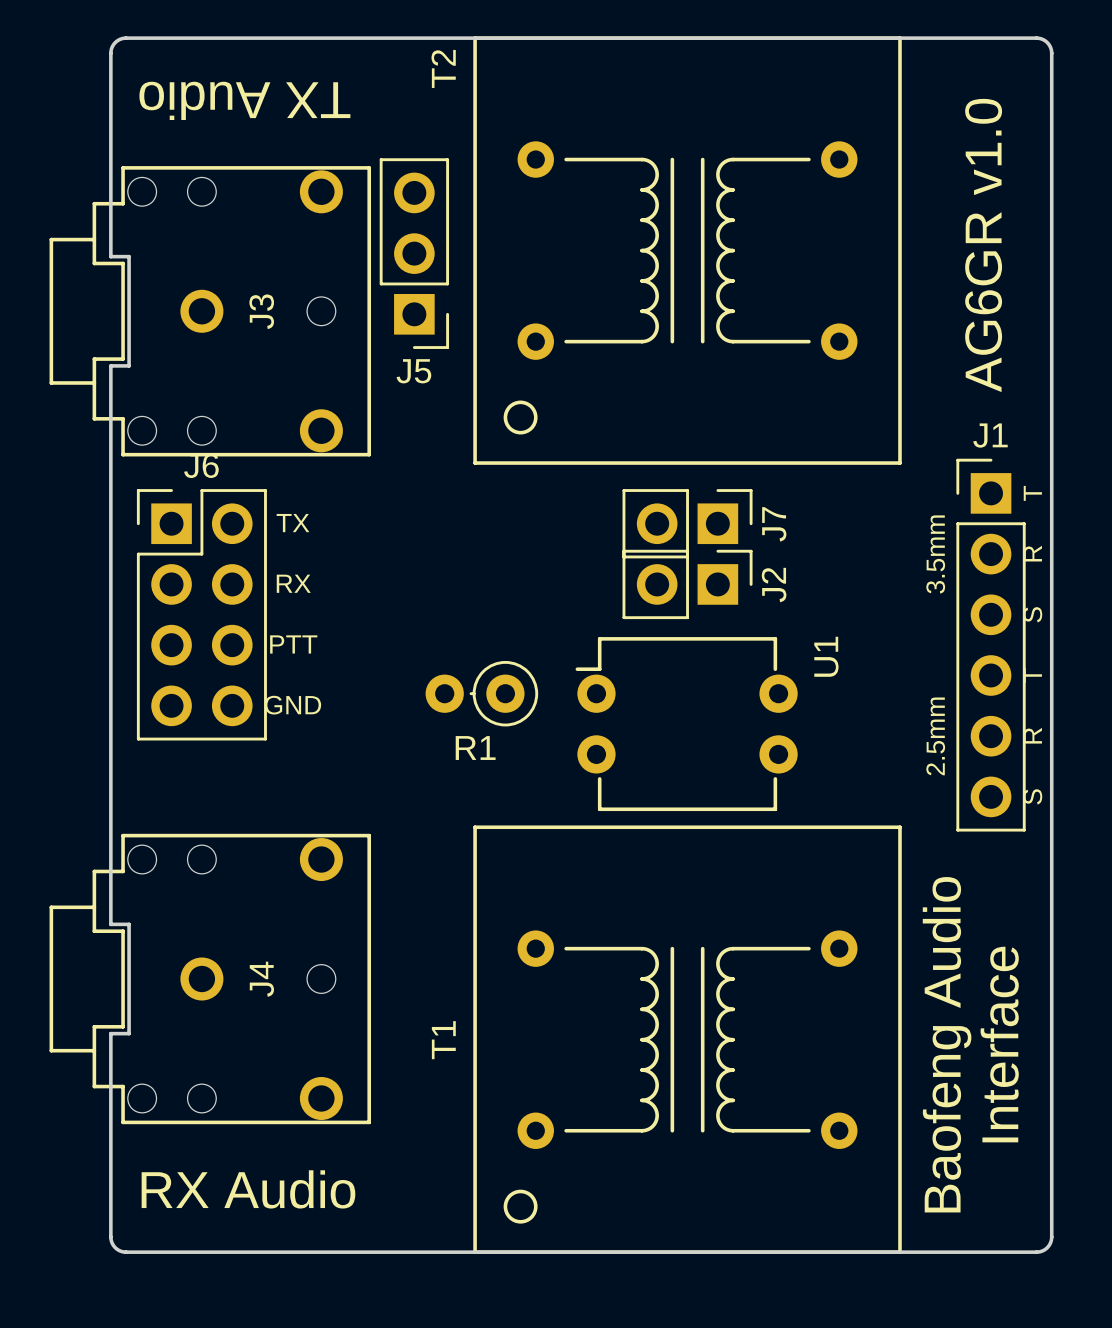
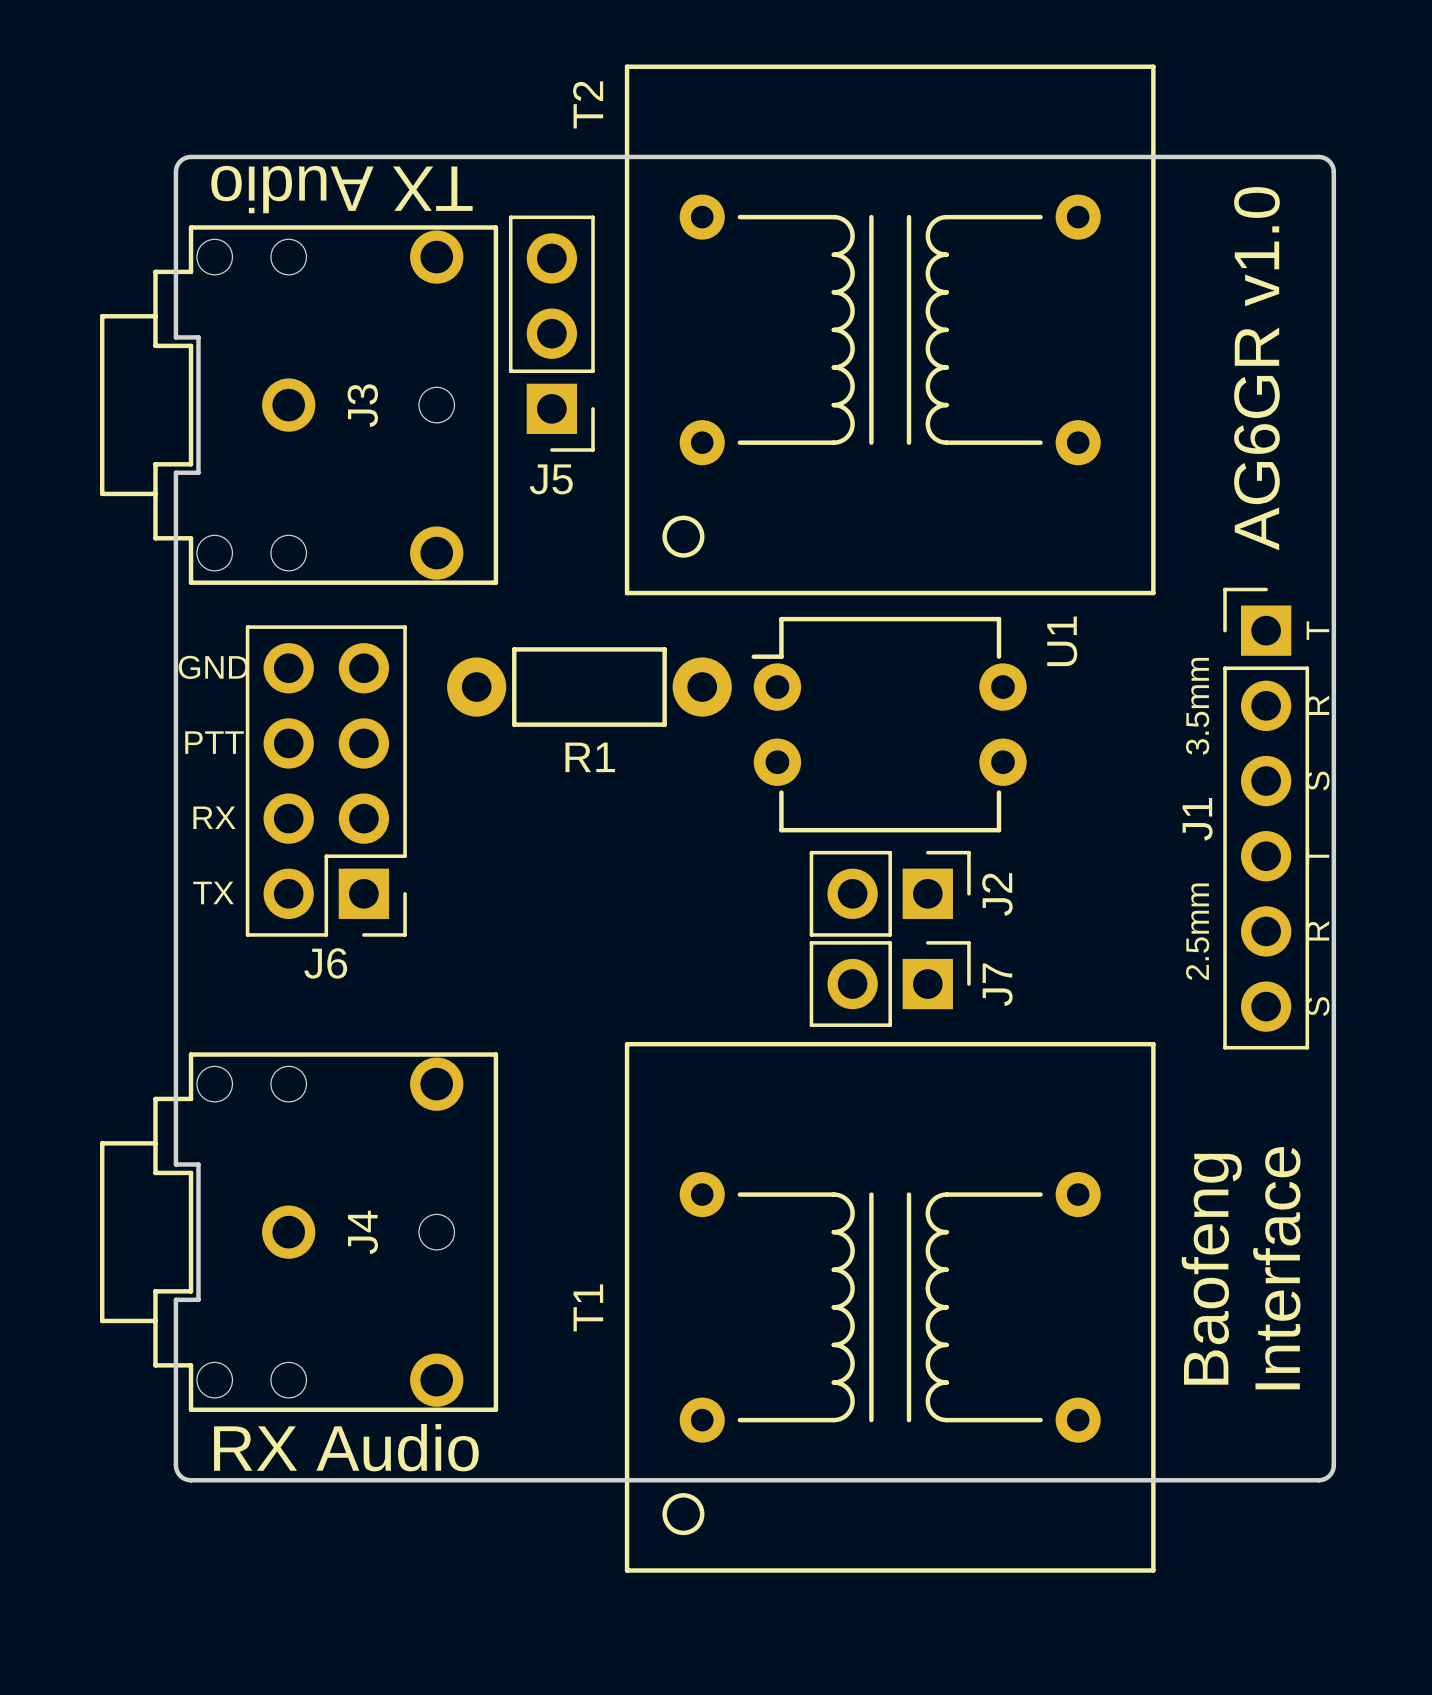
text position: TX Audio (244, 100) -> TX Audio (341, 189)
board edge: (110, 123) (110, 51) (115, 42) (124, 38) (1036, 38) (1047, 42) (1051, 51) (1051, 1236) (1048, 1246) (1044, 1250) (1036, 1252) (124, 1252) (115, 1247) (110, 1238) (110, 1167) -> (175, 172) (180, 161) (190, 156) (1318, 156) (1329, 161) (1333, 172) (1333, 1465) (1329, 1475) (1318, 1480) (190, 1480) (180, 1475) (175, 1465)
text position: AG6GR v1.0 (983, 245) -> AG6GR v1.0 (1256, 368)
J1 name rotation: 0° (990, 435) -> 90° counterclockwise (1197, 819)
J1 name position: J1 (990, 435) -> J1 (1197, 819)
text position: TX (292, 523) -> TX (213, 892)
J7 position: (687, 523) -> (890, 984)
text position: RX (293, 583) -> RX (214, 817)
J2 position: (687, 584) -> (890, 893)
J6 rotation: 0° (201, 614) -> 180° (326, 781)
text position: PTT (293, 644) -> PTT (214, 742)
R1 footprint: [425, 660, 539, 727] -> [447, 647, 732, 727]
text position: GND (292, 705) -> GND (213, 667)
U1 position: (686, 724) -> (889, 724)
text: Baofeng Audio (947, 1044) -> Baofeng (1211, 1269)
text position: Interface (999, 1044) -> Interface (1276, 1268)
text position: RX Audio (248, 1189) -> RX Audio (346, 1447)

